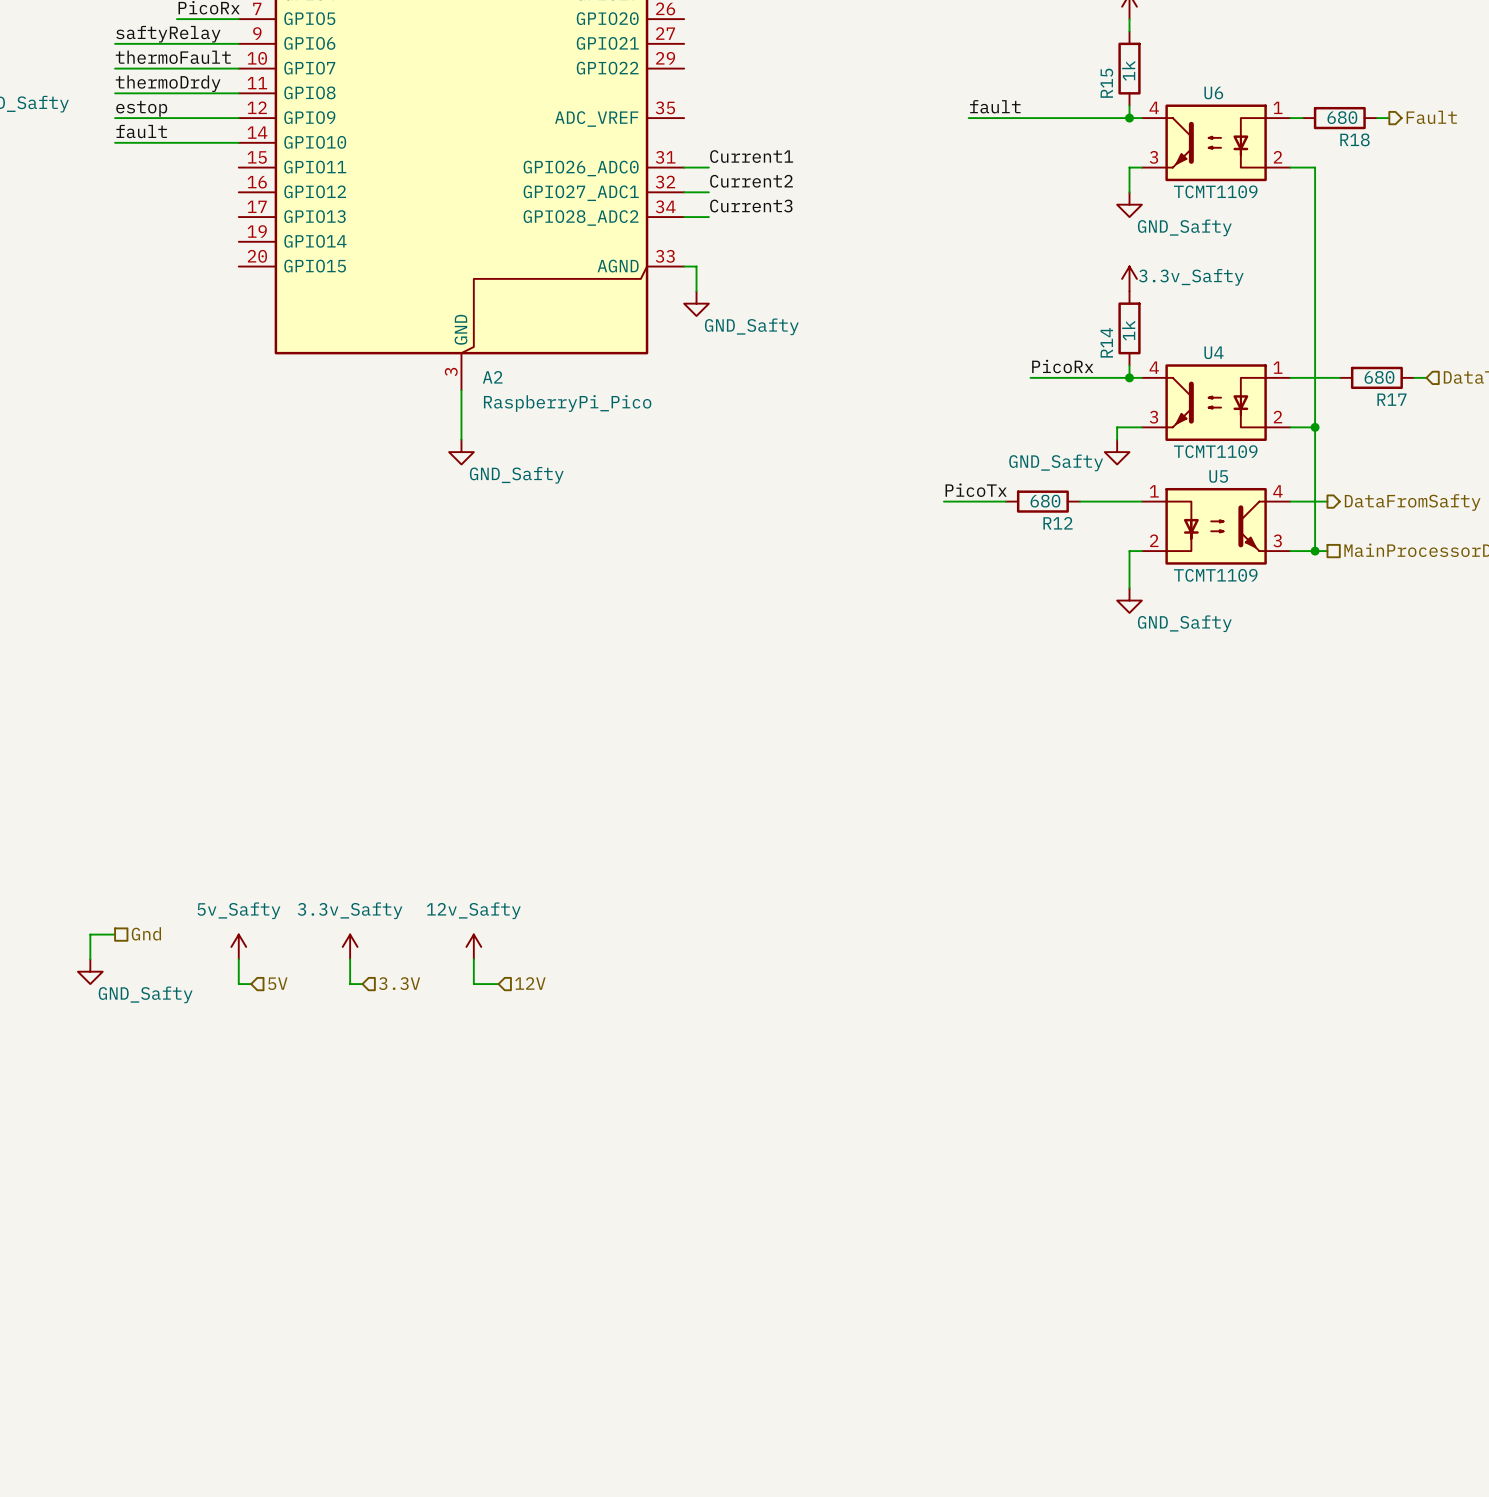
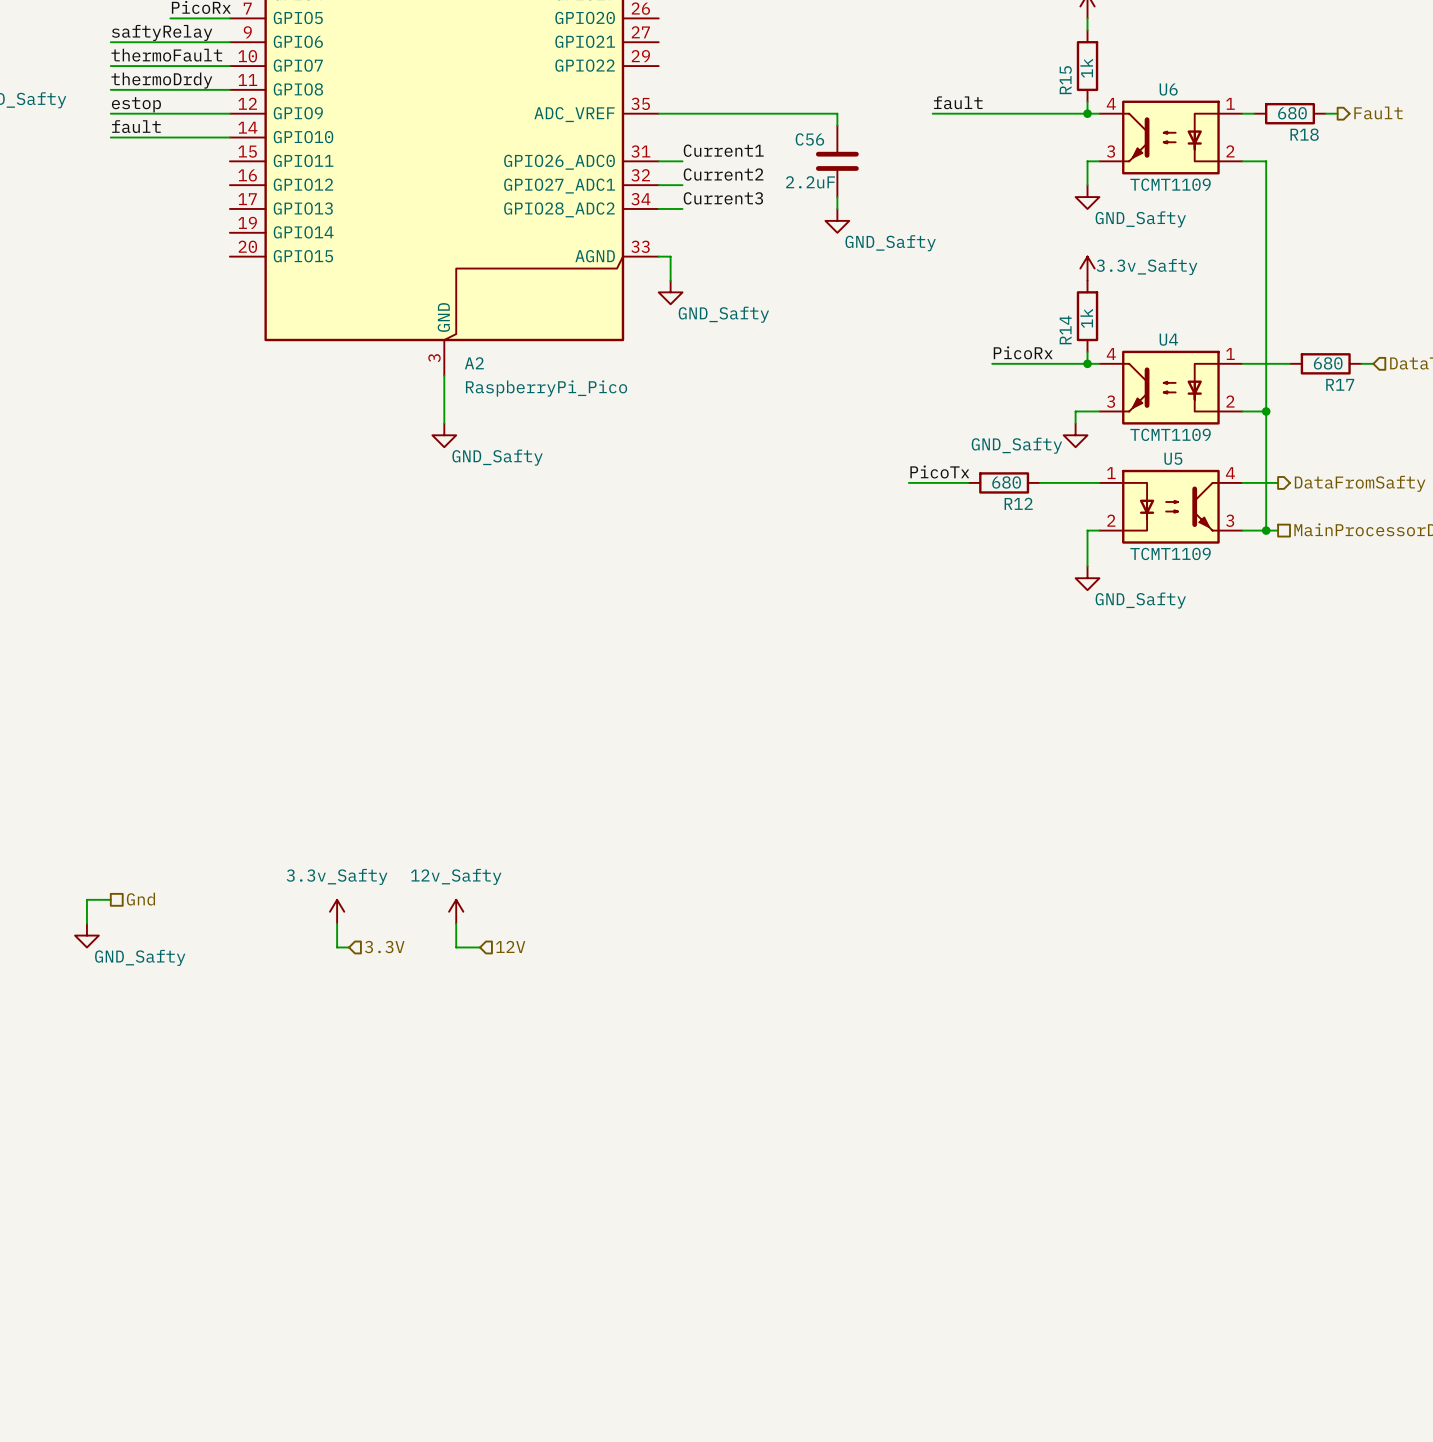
wire: none -> (658, 113) (837, 113) (837, 125)
C56: none -> 2.2uF (837, 161)
wire: none -> (837, 197) (837, 208)
power symbol: none -> GND_Safty (837, 220)
power symbol: 5v_Safty (238, 946) -> none
wire: (238, 959) (238, 984) (251, 984) -> none
hierarchical label: 5V (277, 983) -> none

